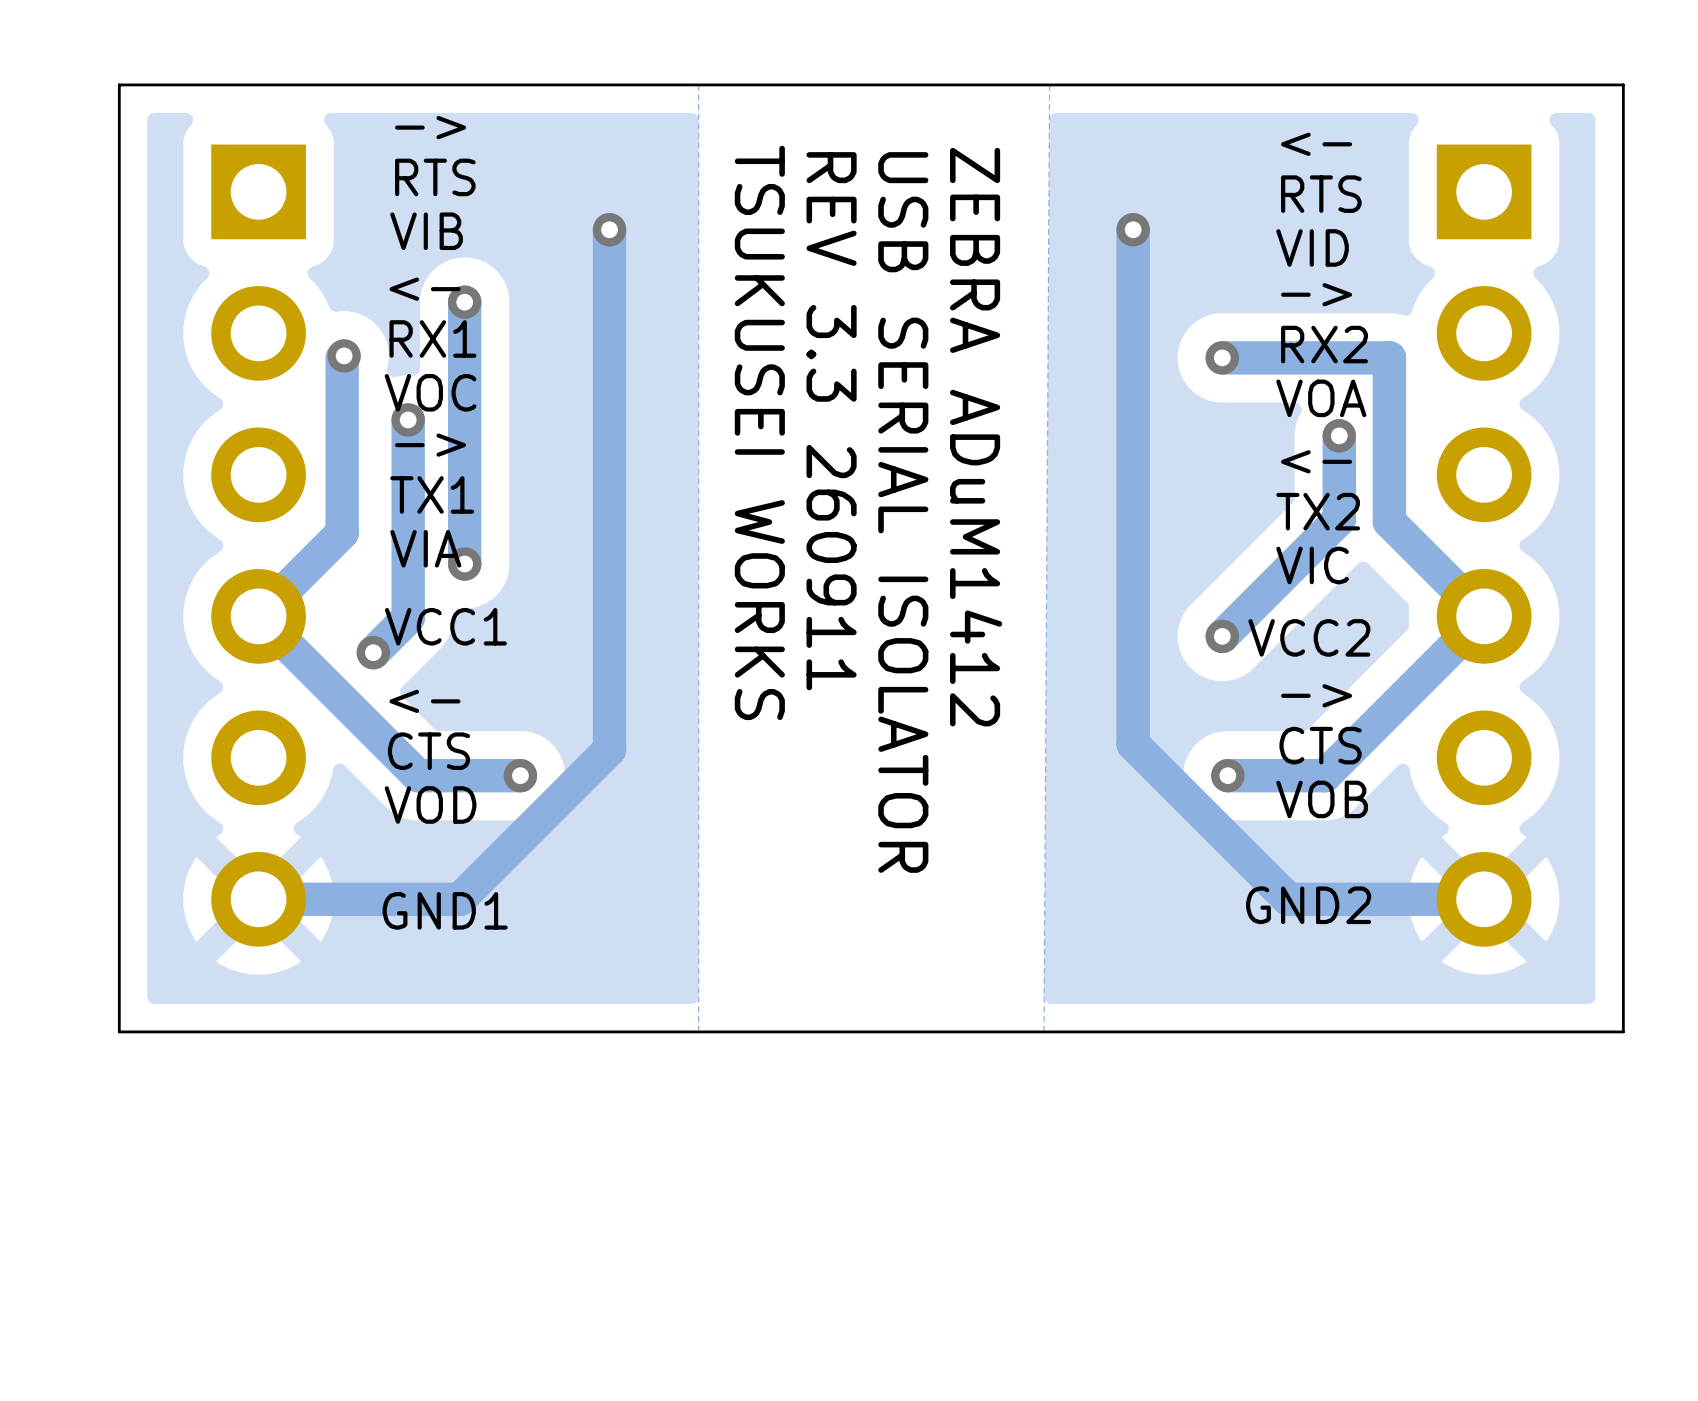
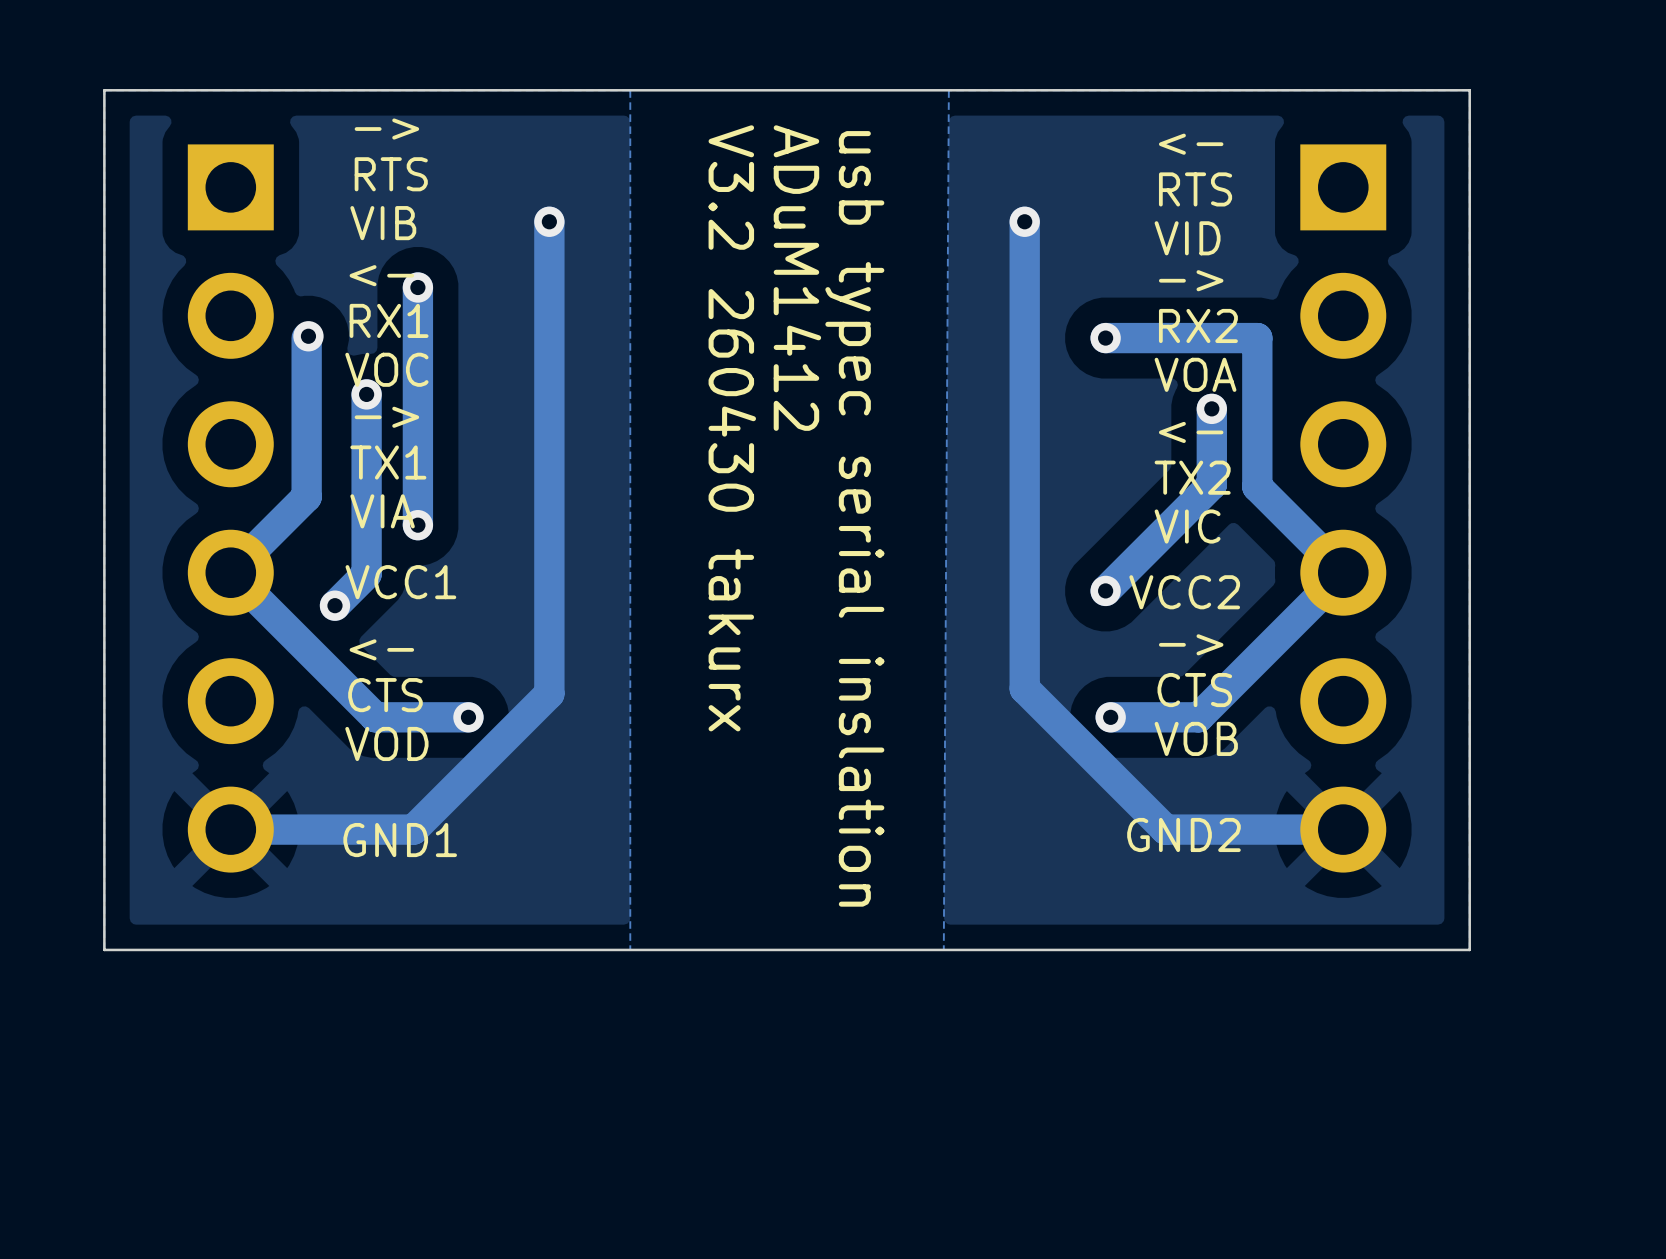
text: REV 3.3 260911 (831, 421) -> none
text: TSUKUSEI WORKS (759, 432) -> none
text: ZEBRA ADuM1412 (976, 437) -> ADuM1412 (797, 278)
text: none -> V3.2 260430 takurx (732, 428)
text: USB SERIAL ISOLATOR (903, 512) -> none
text: none -> usb typec serial inslation (854, 518)

